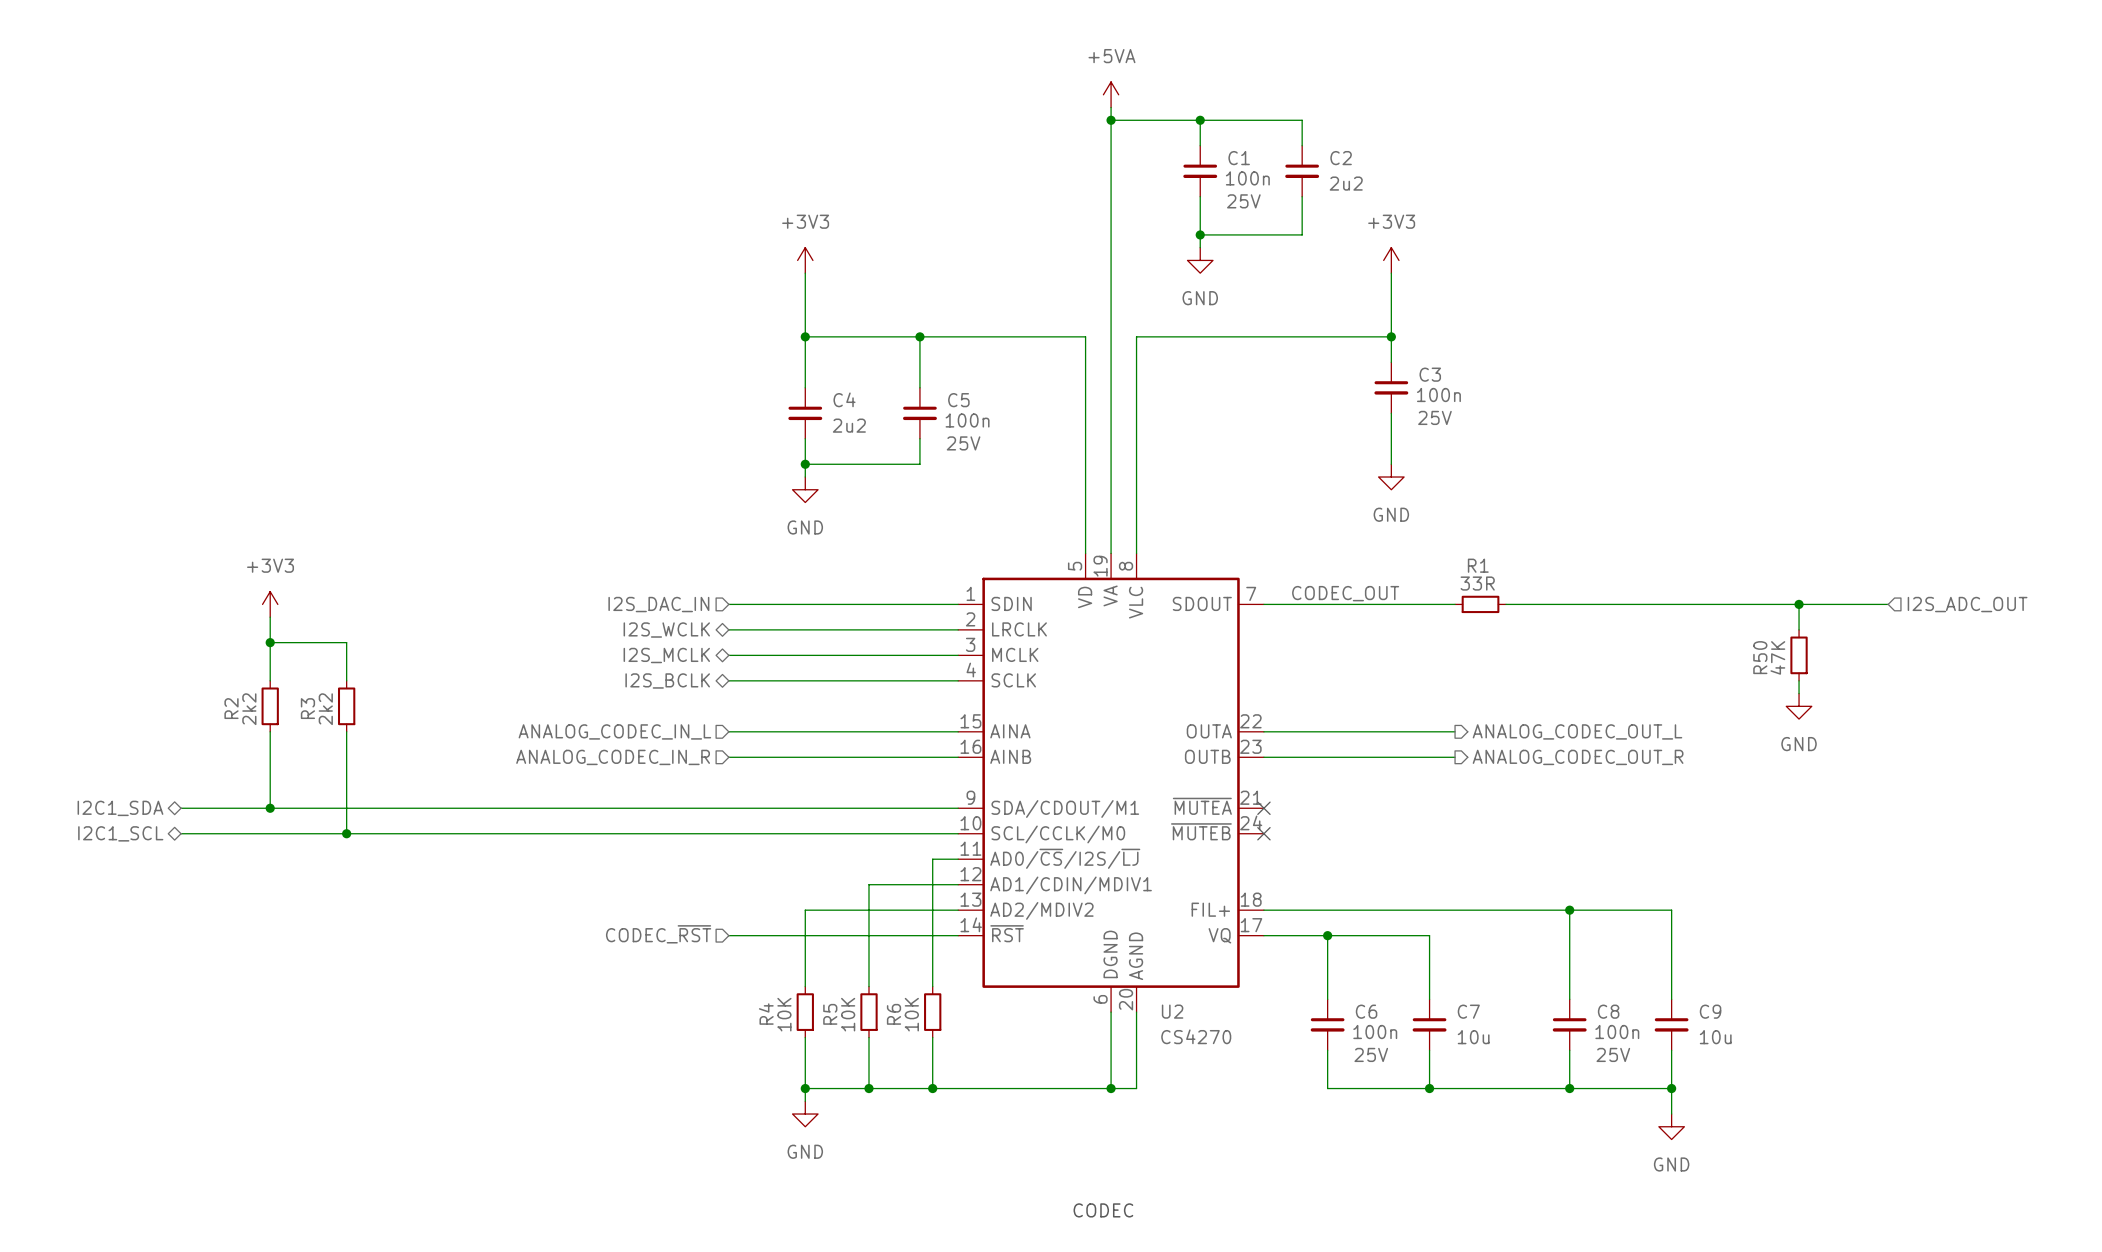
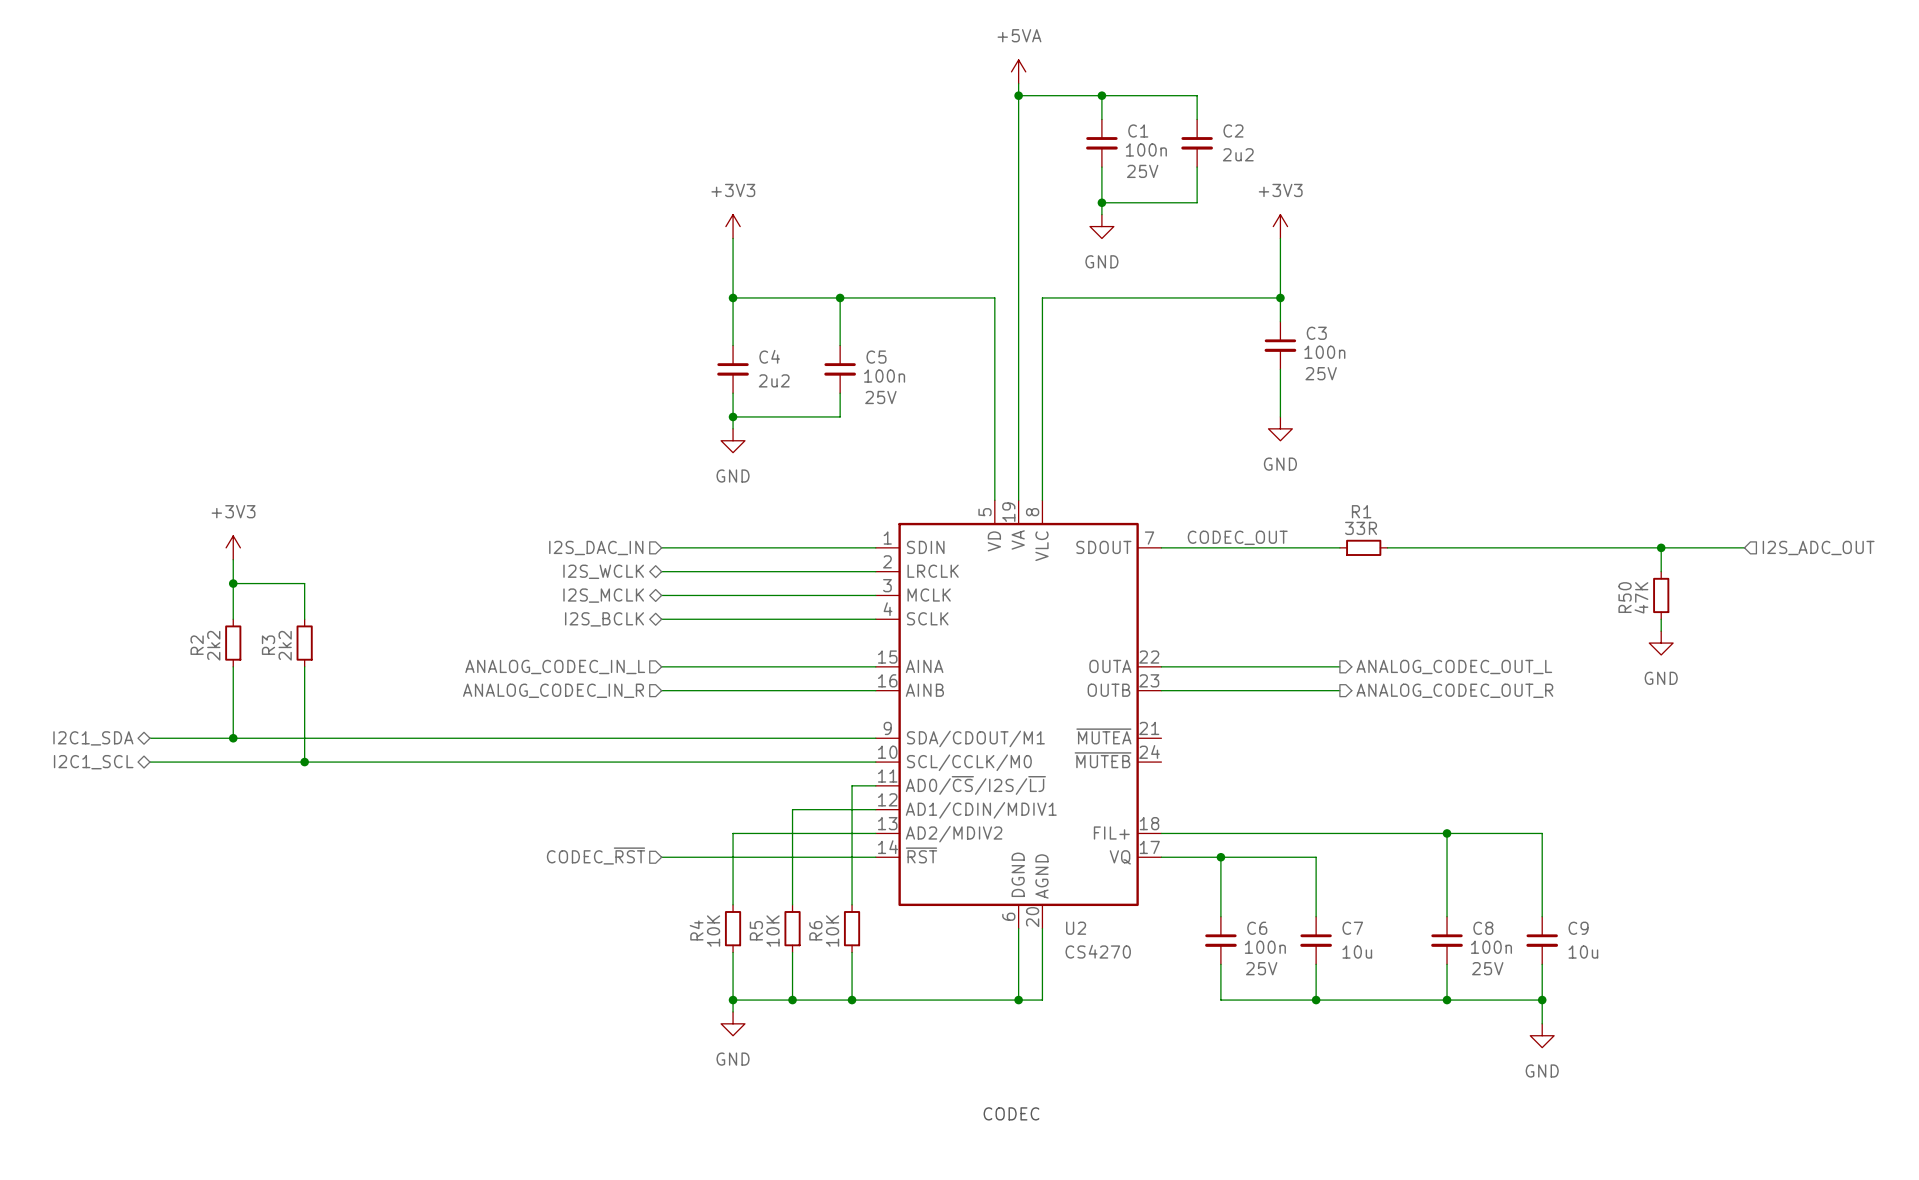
no-connect mark: (1263, 808) -> none
no-connect mark: (1263, 833) -> none

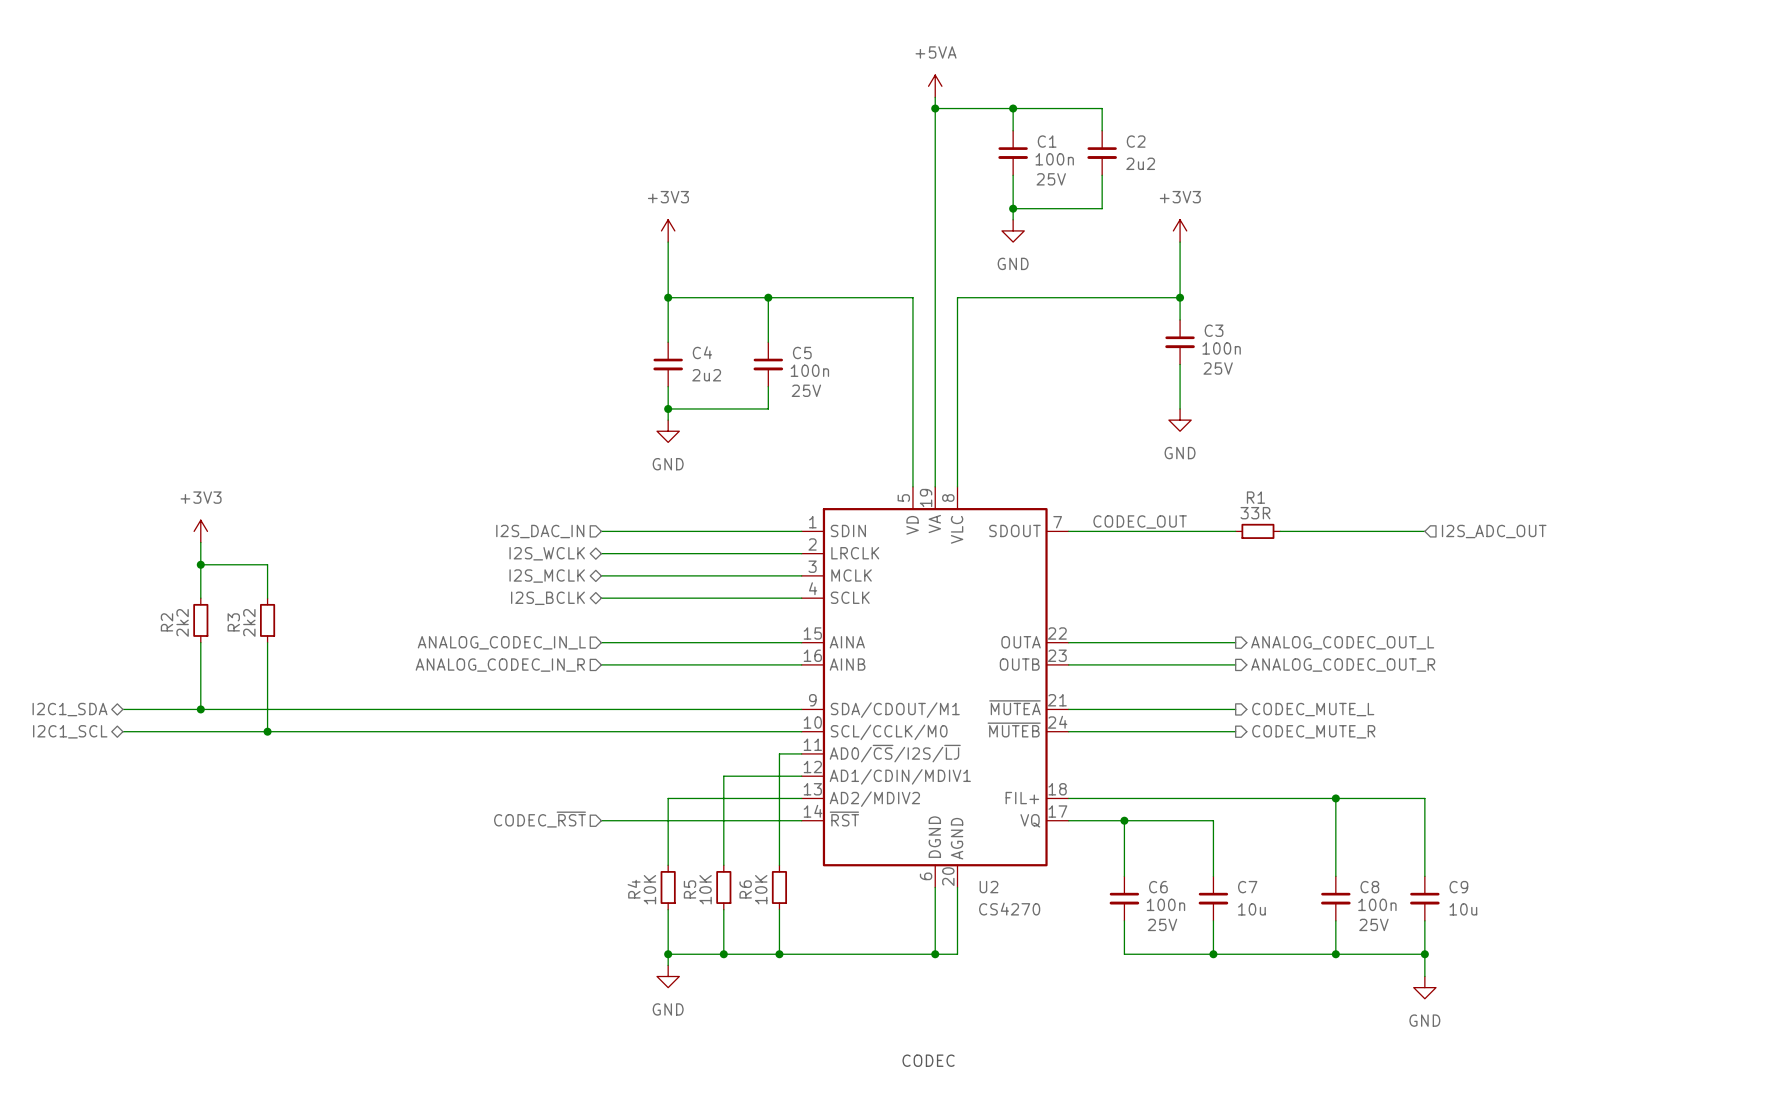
wire: (1542, 547) (1744, 547) -> none
wire: (1661, 547) (1661, 571) -> none
junction: (1661, 547) -> none
hierarchical label position: I2S_ADC_OUT (1818, 547) -> I2S_ADC_OUT (1494, 531)
R50: 47K (1661, 595) -> none
wire: (1661, 619) (1661, 631) -> none
power symbol: GND (1661, 643) -> none
wire: none -> (1068, 709) (1235, 709)
hierarchical label: none -> CODEC_MUTE_L (1313, 709)
wire: none -> (1068, 731) (1235, 731)
hierarchical label: none -> CODEC_MUTE_R (1313, 731)

